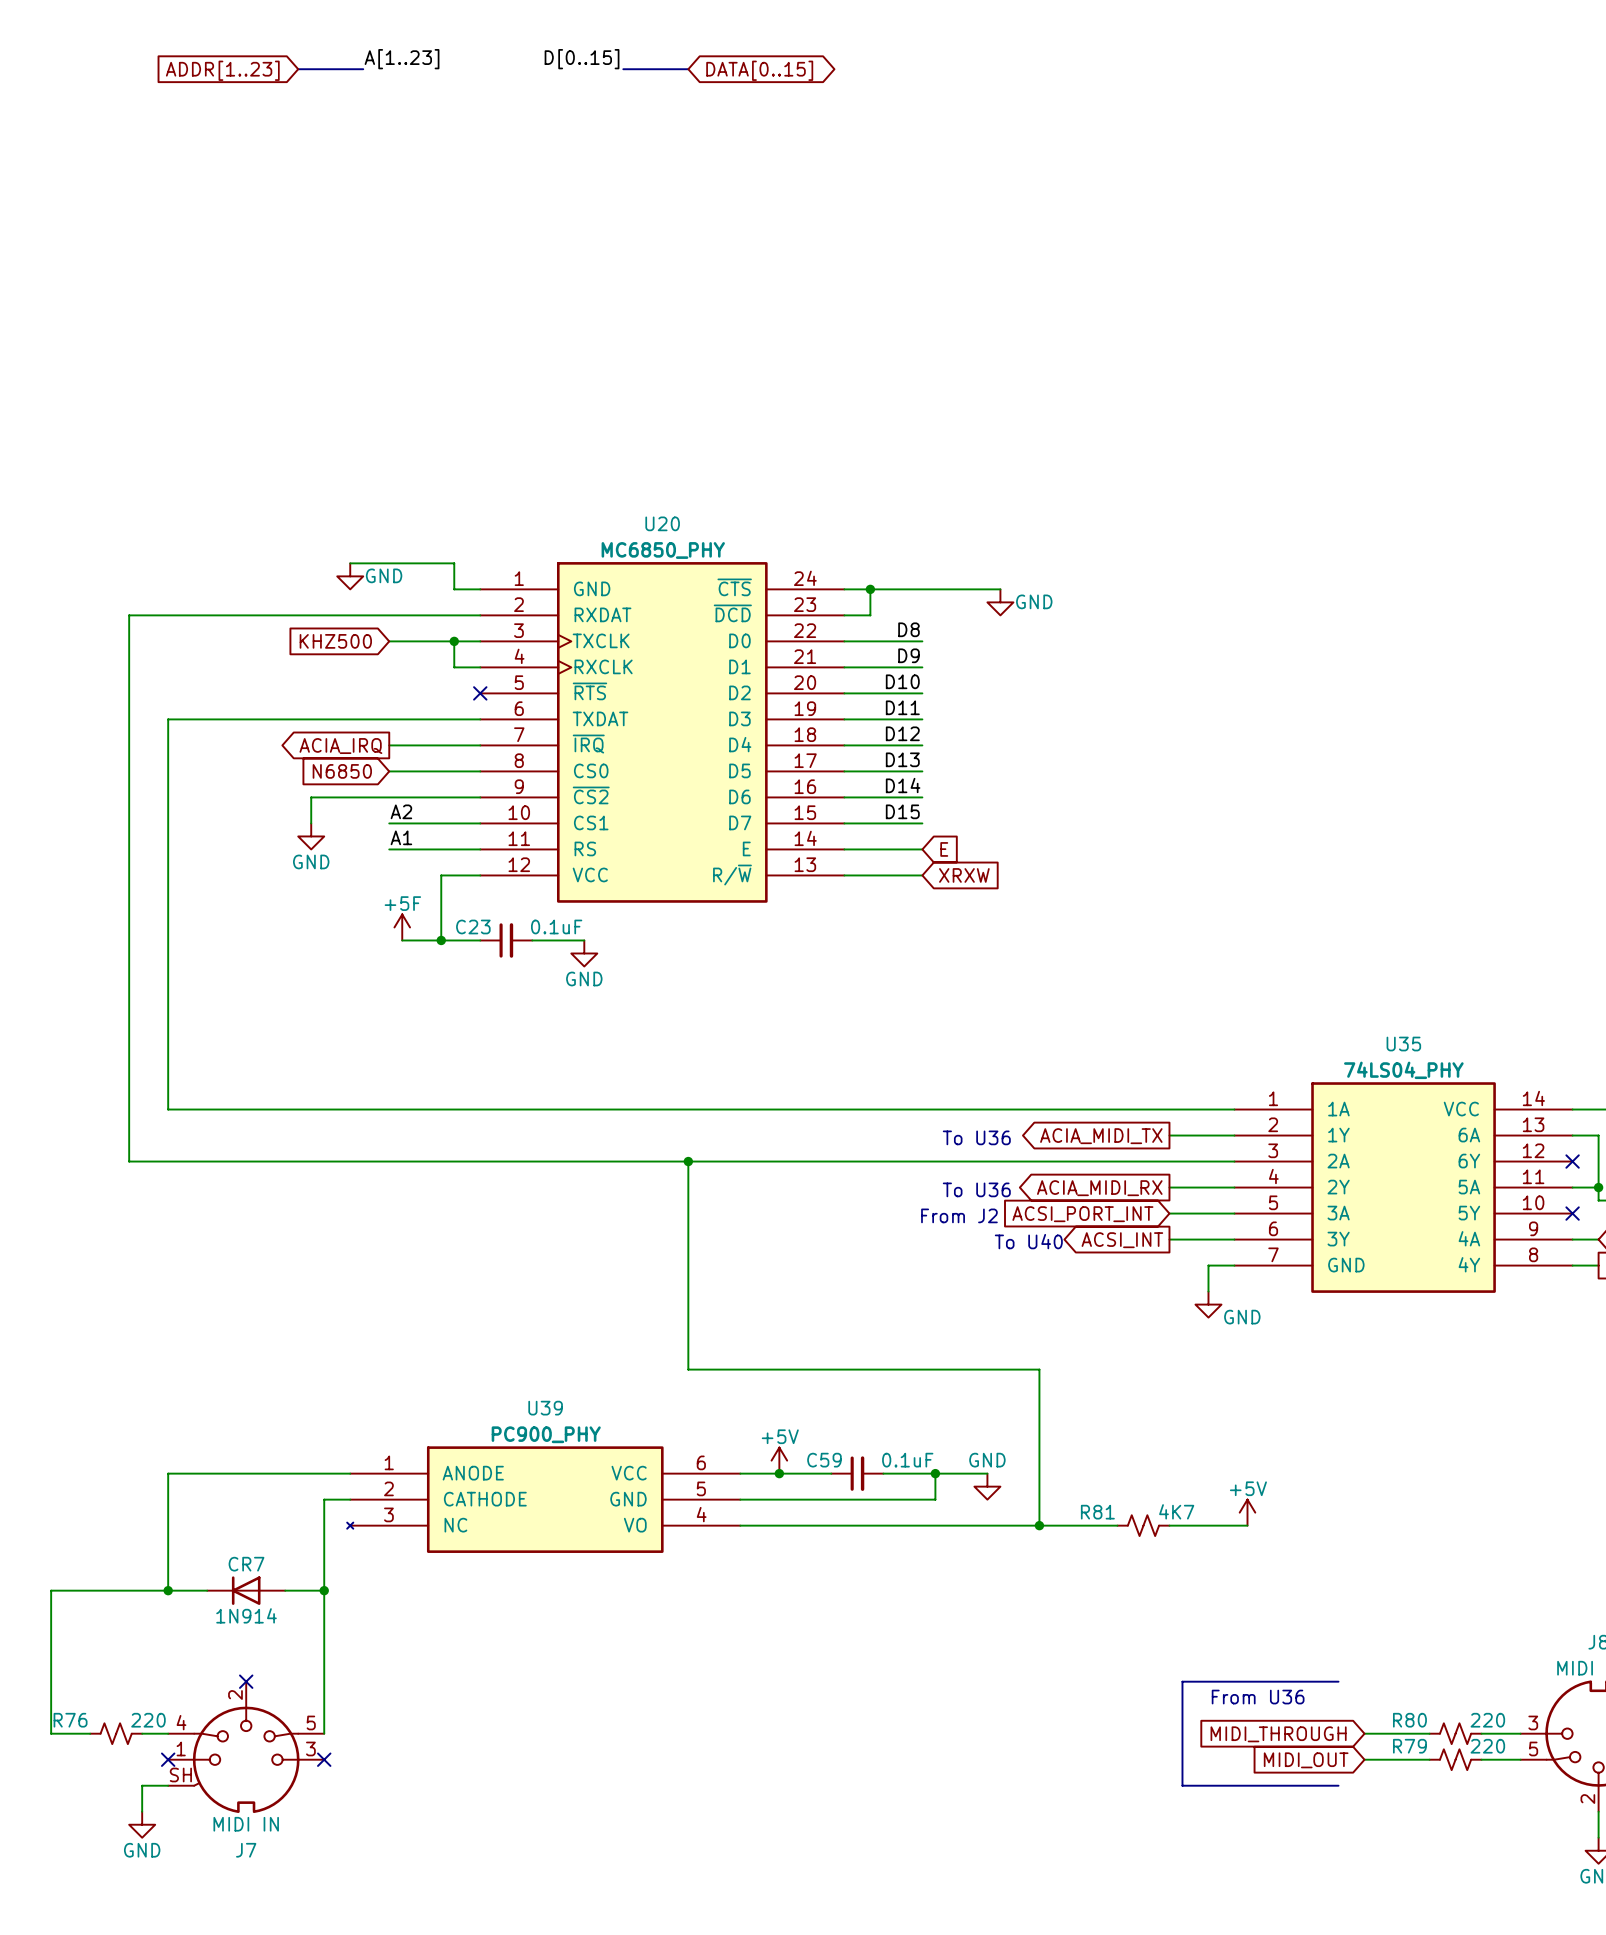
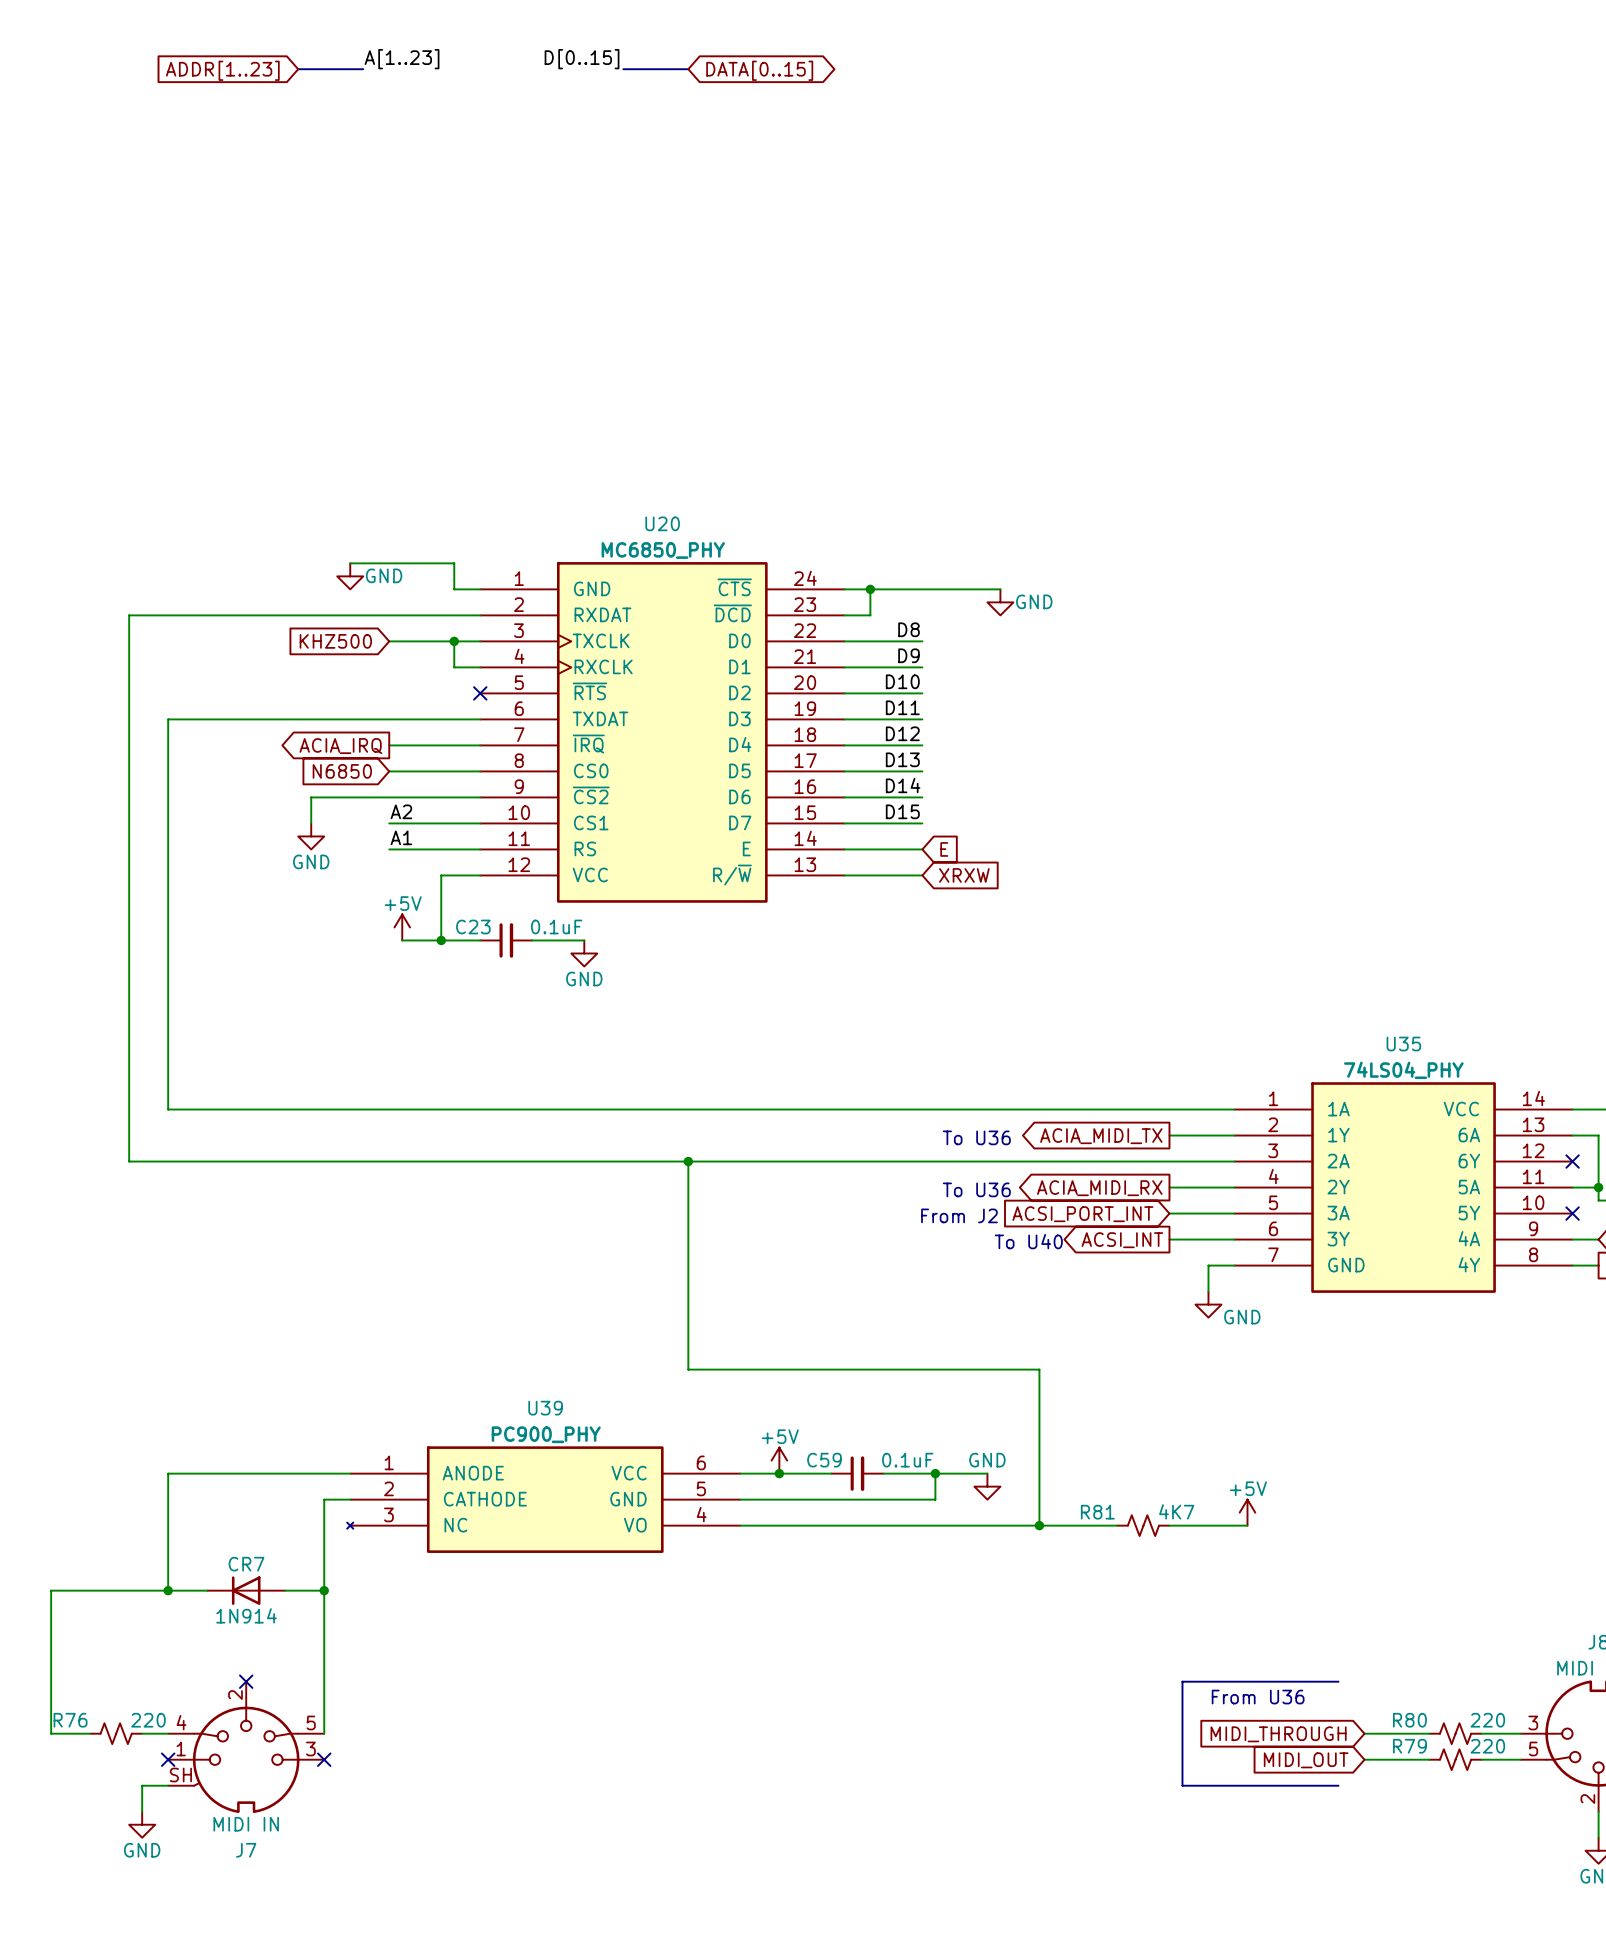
power symbol: +5F (402, 927) -> +5V (402, 927)

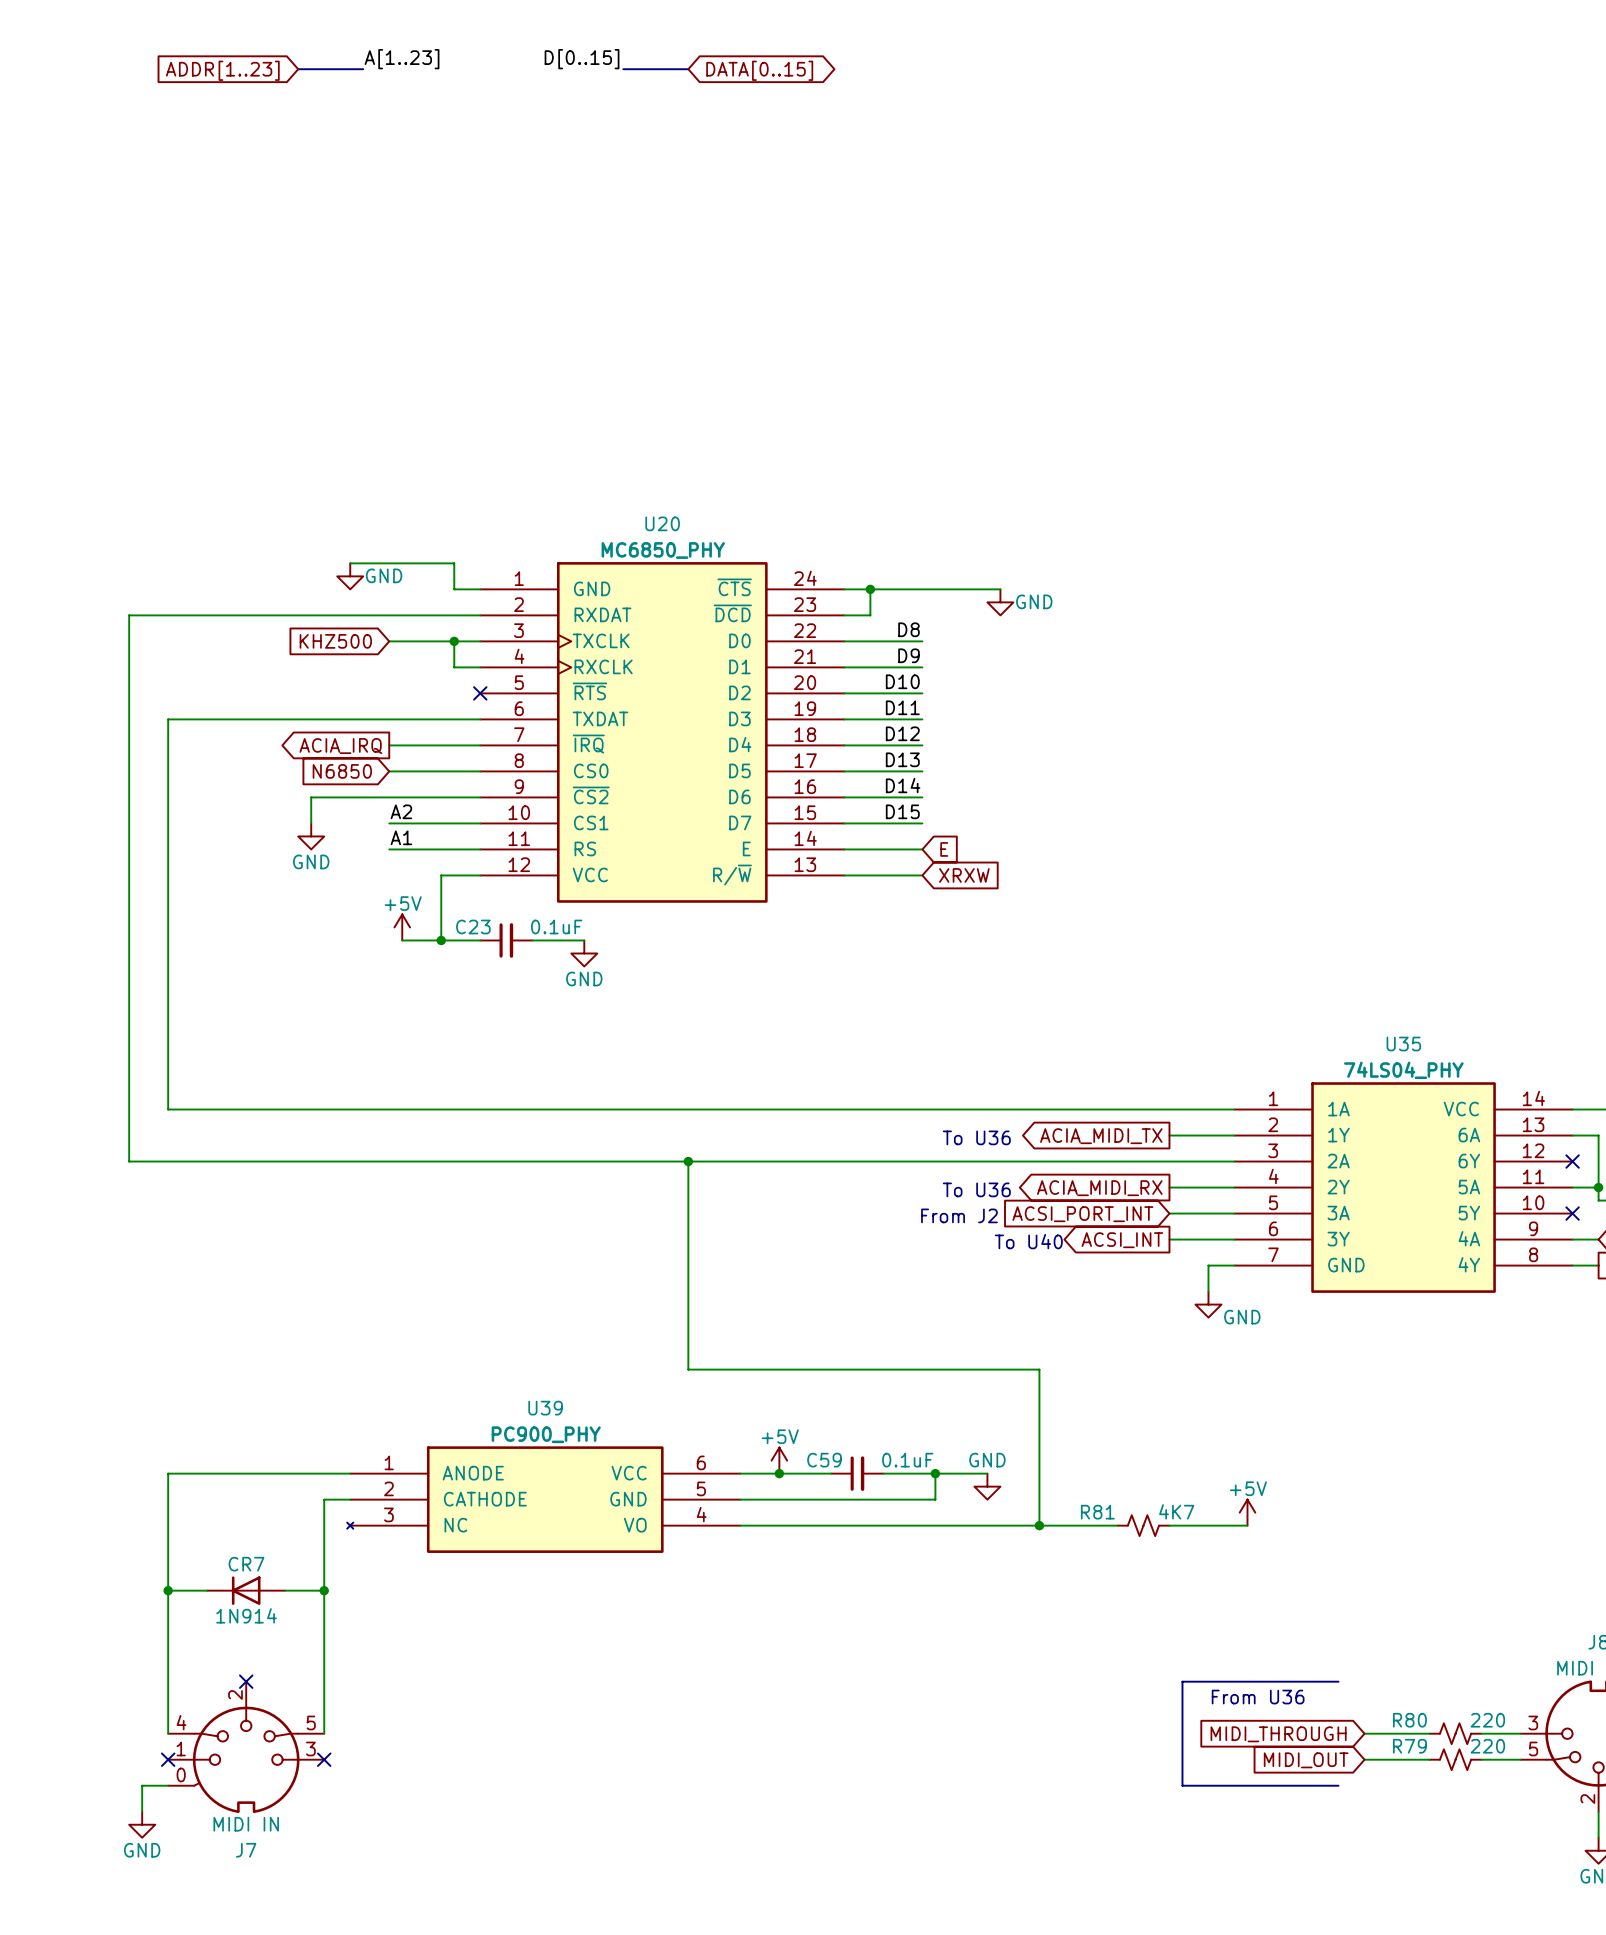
wire: (168, 1590) (51, 1590) (51, 1733) (90, 1733) -> (168, 1590) (168, 1733)
R76: 220 (116, 1733) -> none
wire: (142, 1733) (168, 1733) -> none
J7 pin number: SH (180, 1774) -> 0 (181, 1774)

